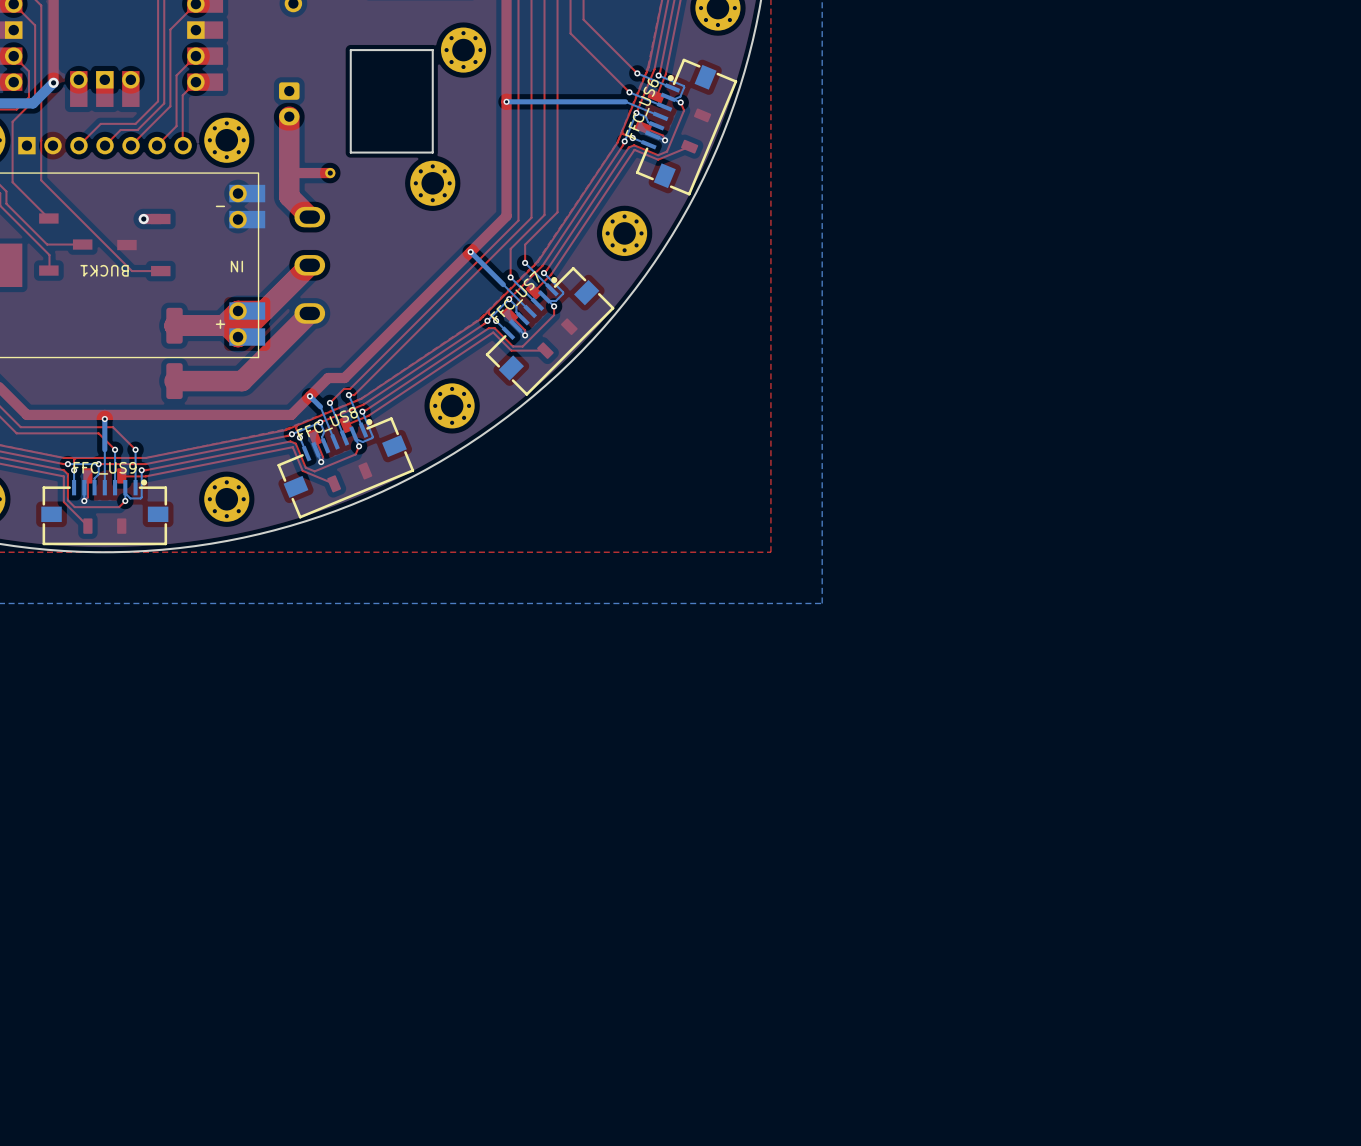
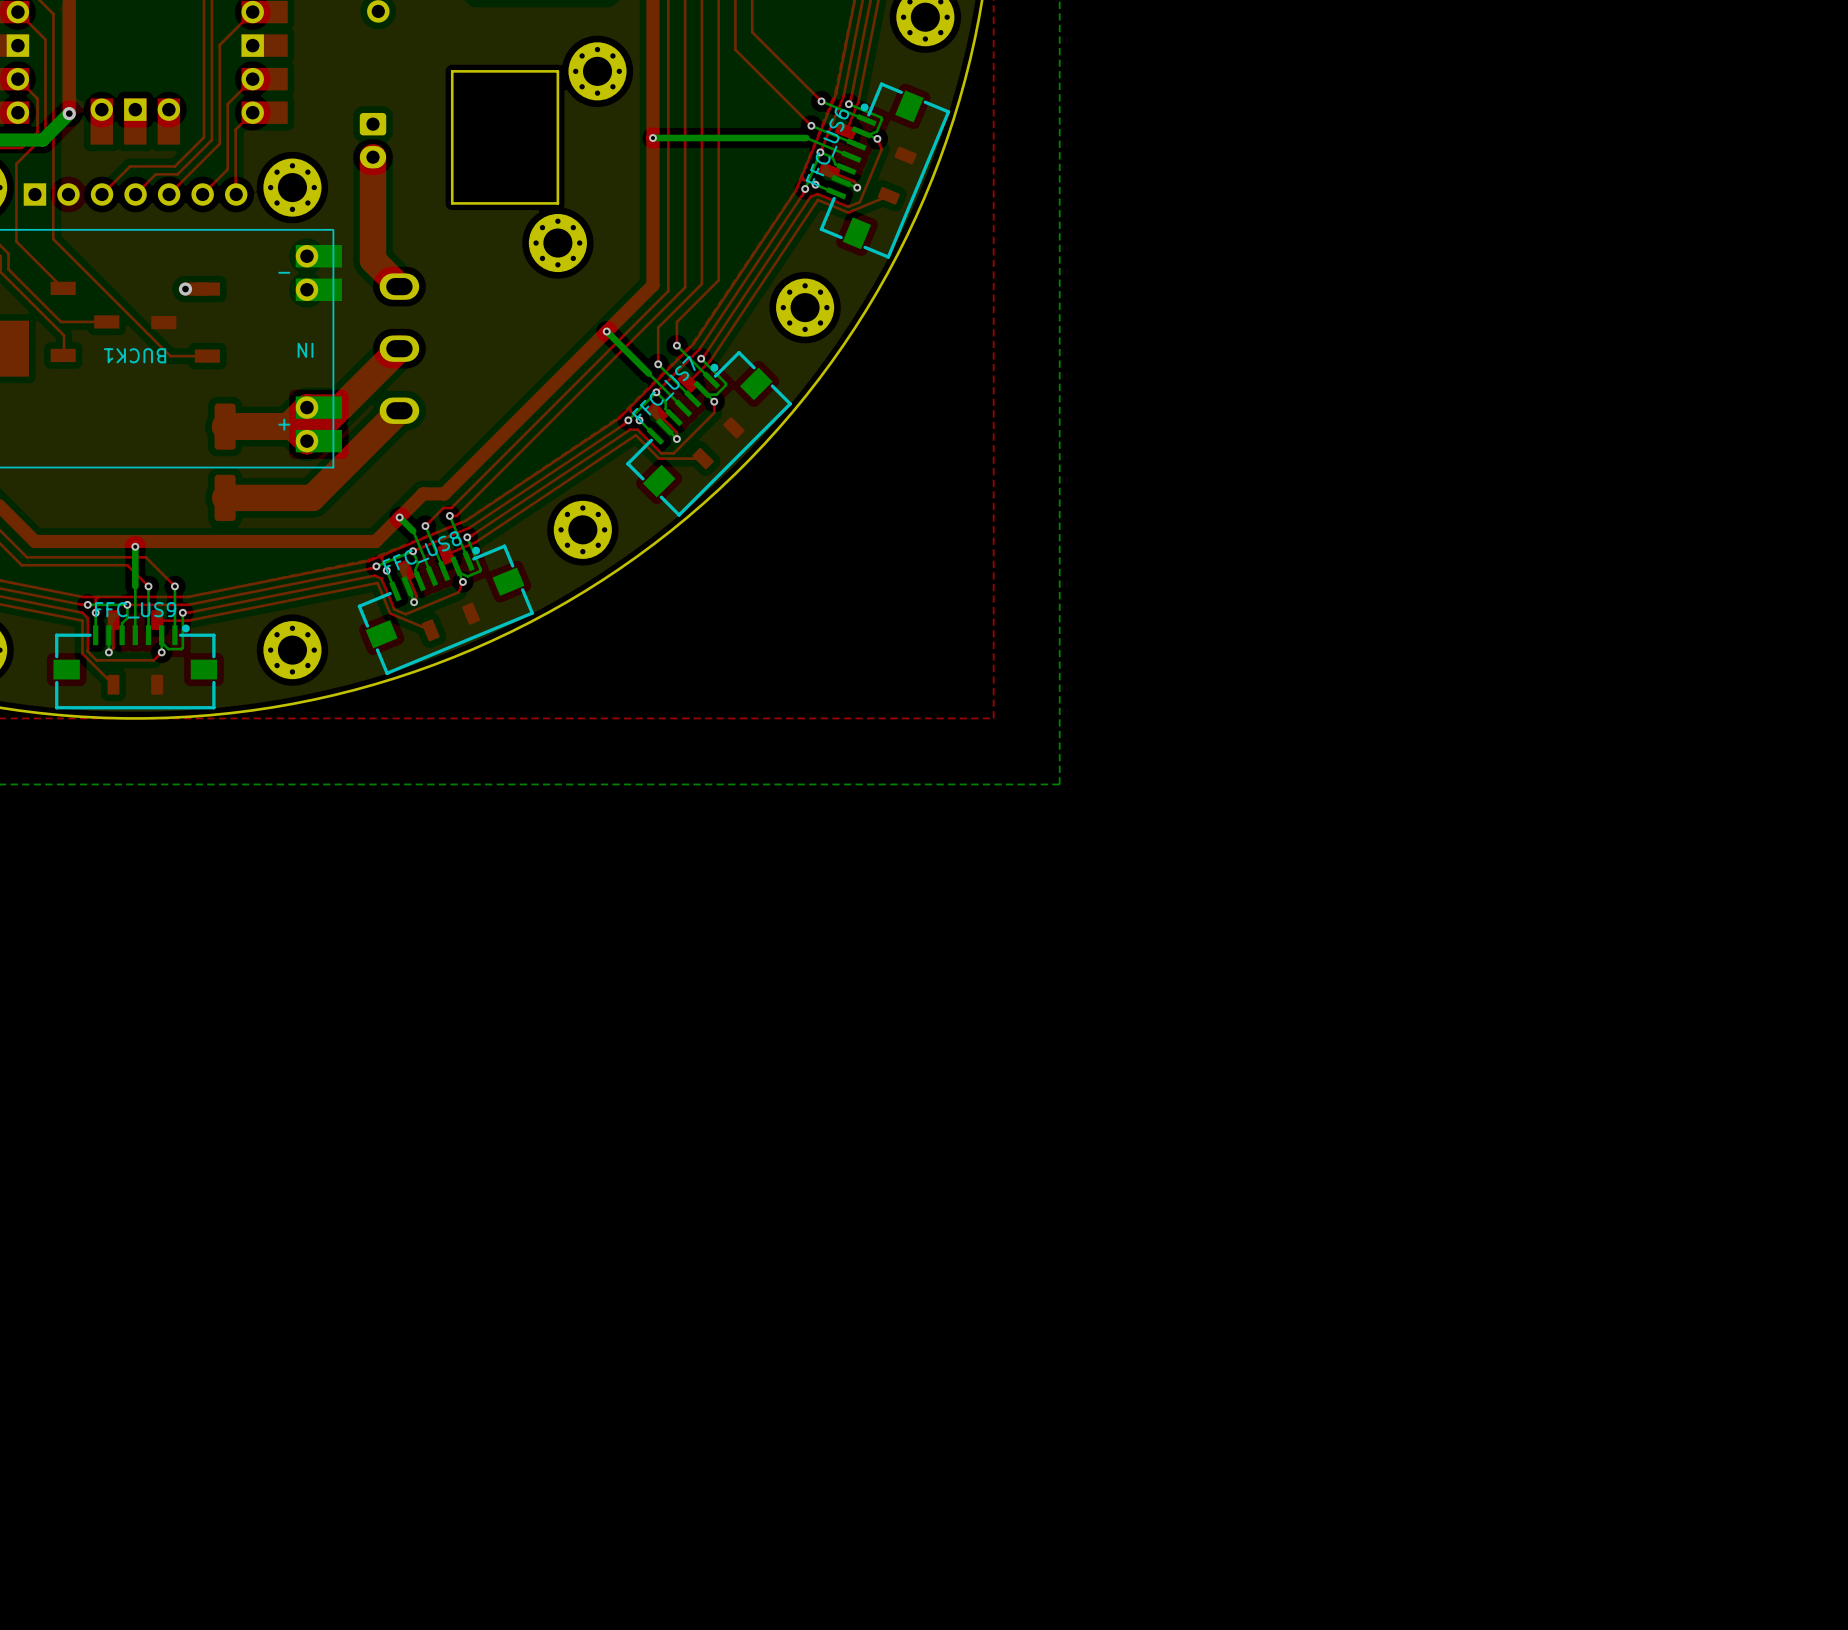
top track: (330, 173) (289, 173) -> none
part: (330, 173) -> none

